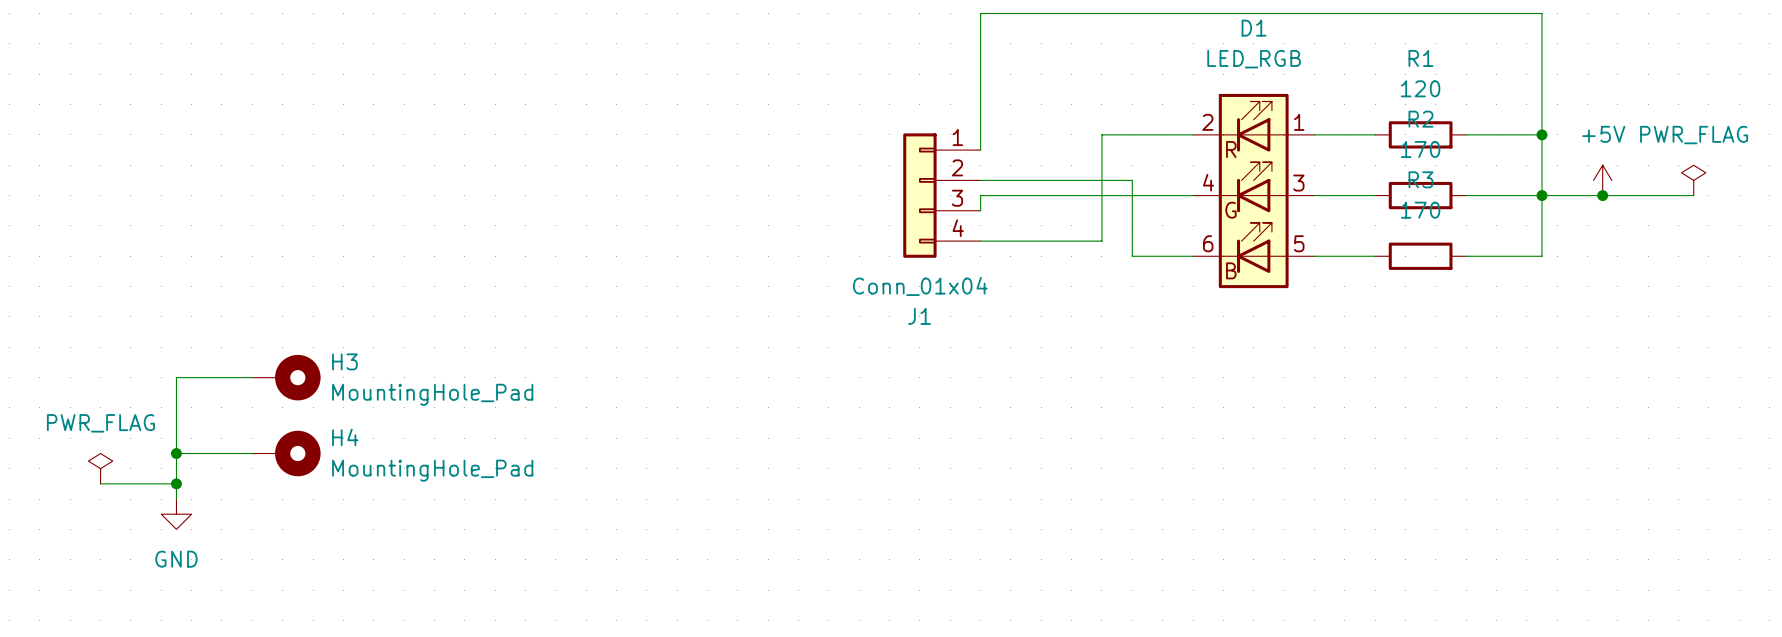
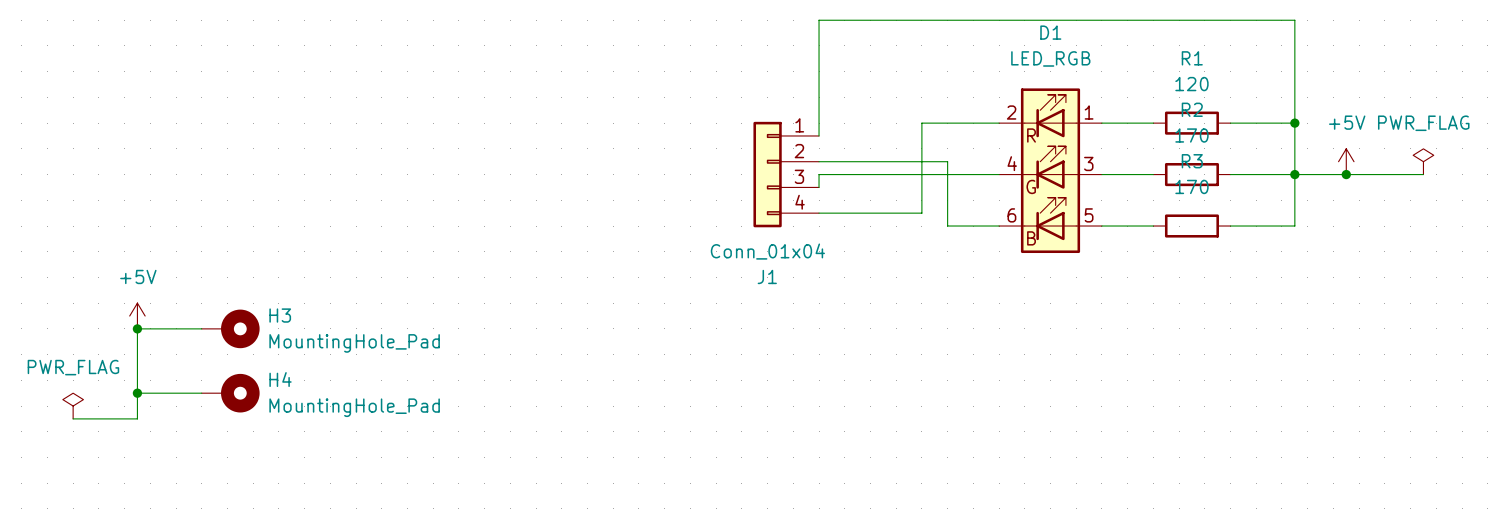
power symbol: none -> +5V (137, 316)
junction: none -> (137, 328)
wire: (176, 483) (176, 499) -> none
junction: (176, 483) -> none
power symbol: GND (176, 514) -> none

